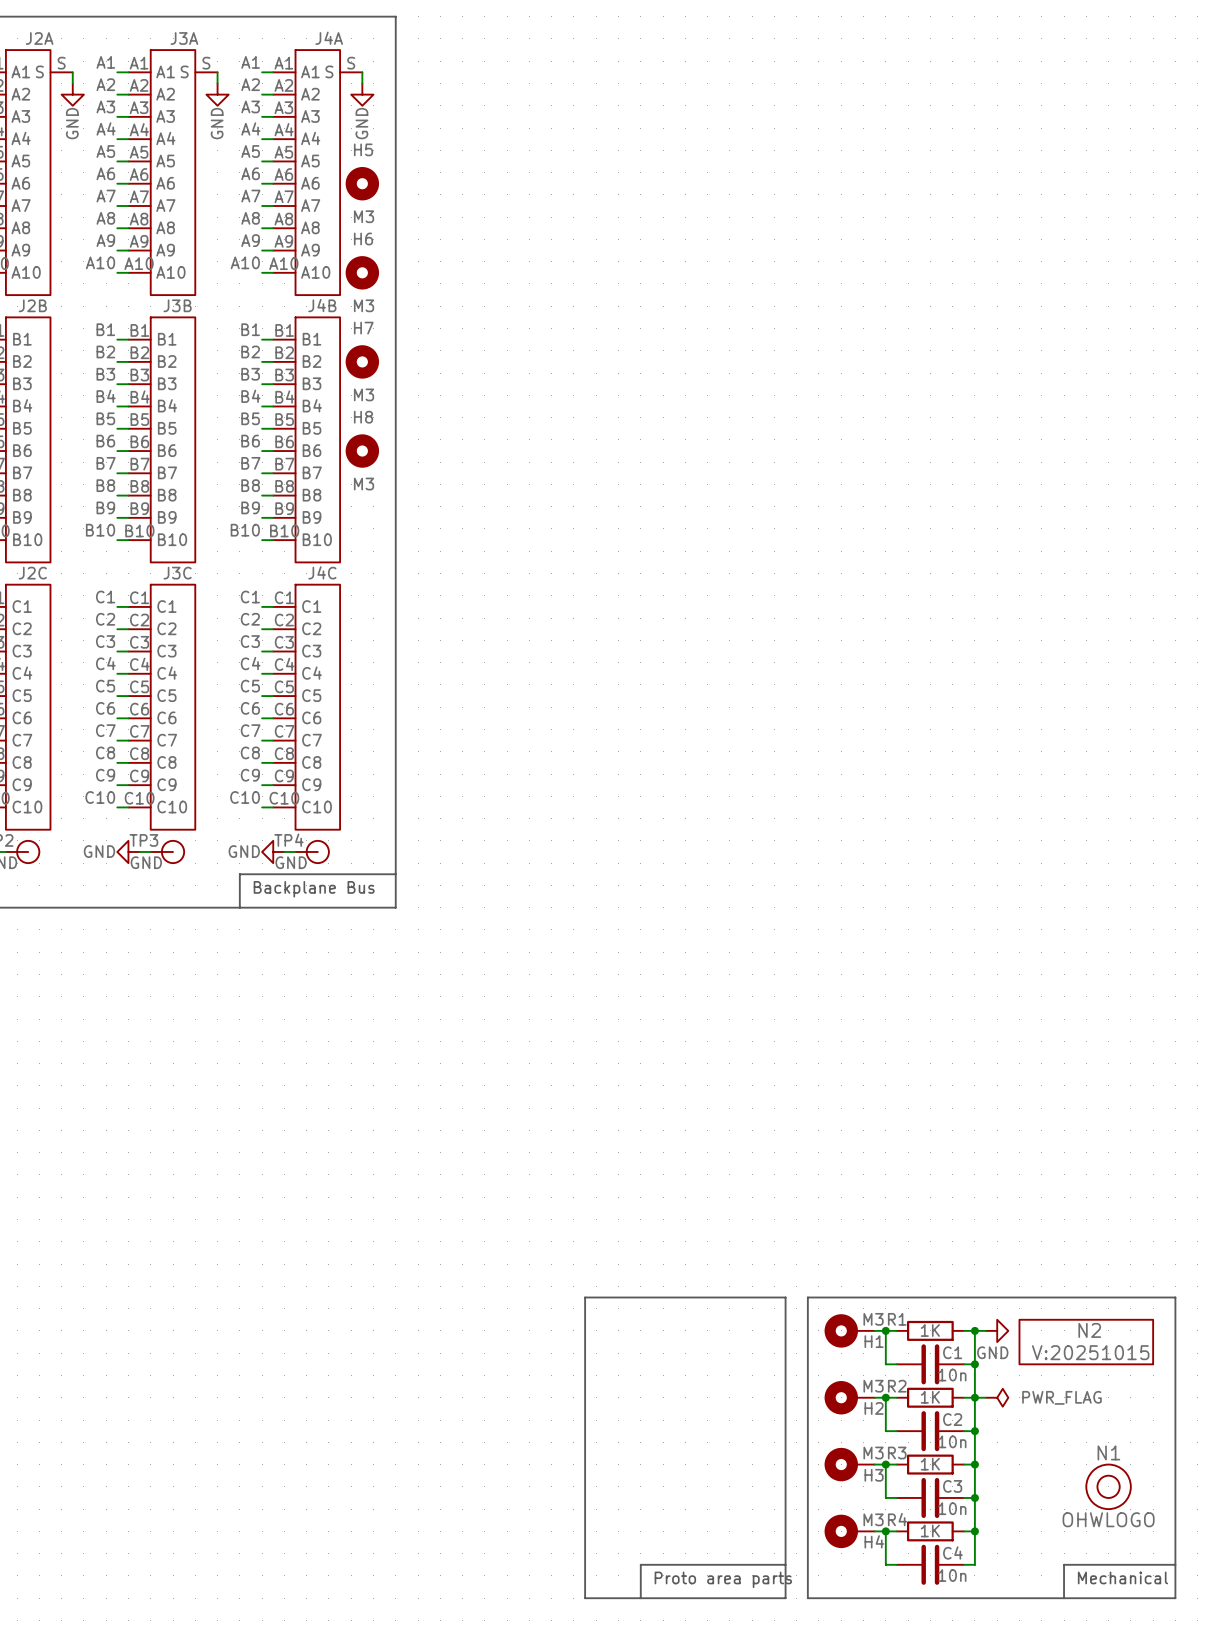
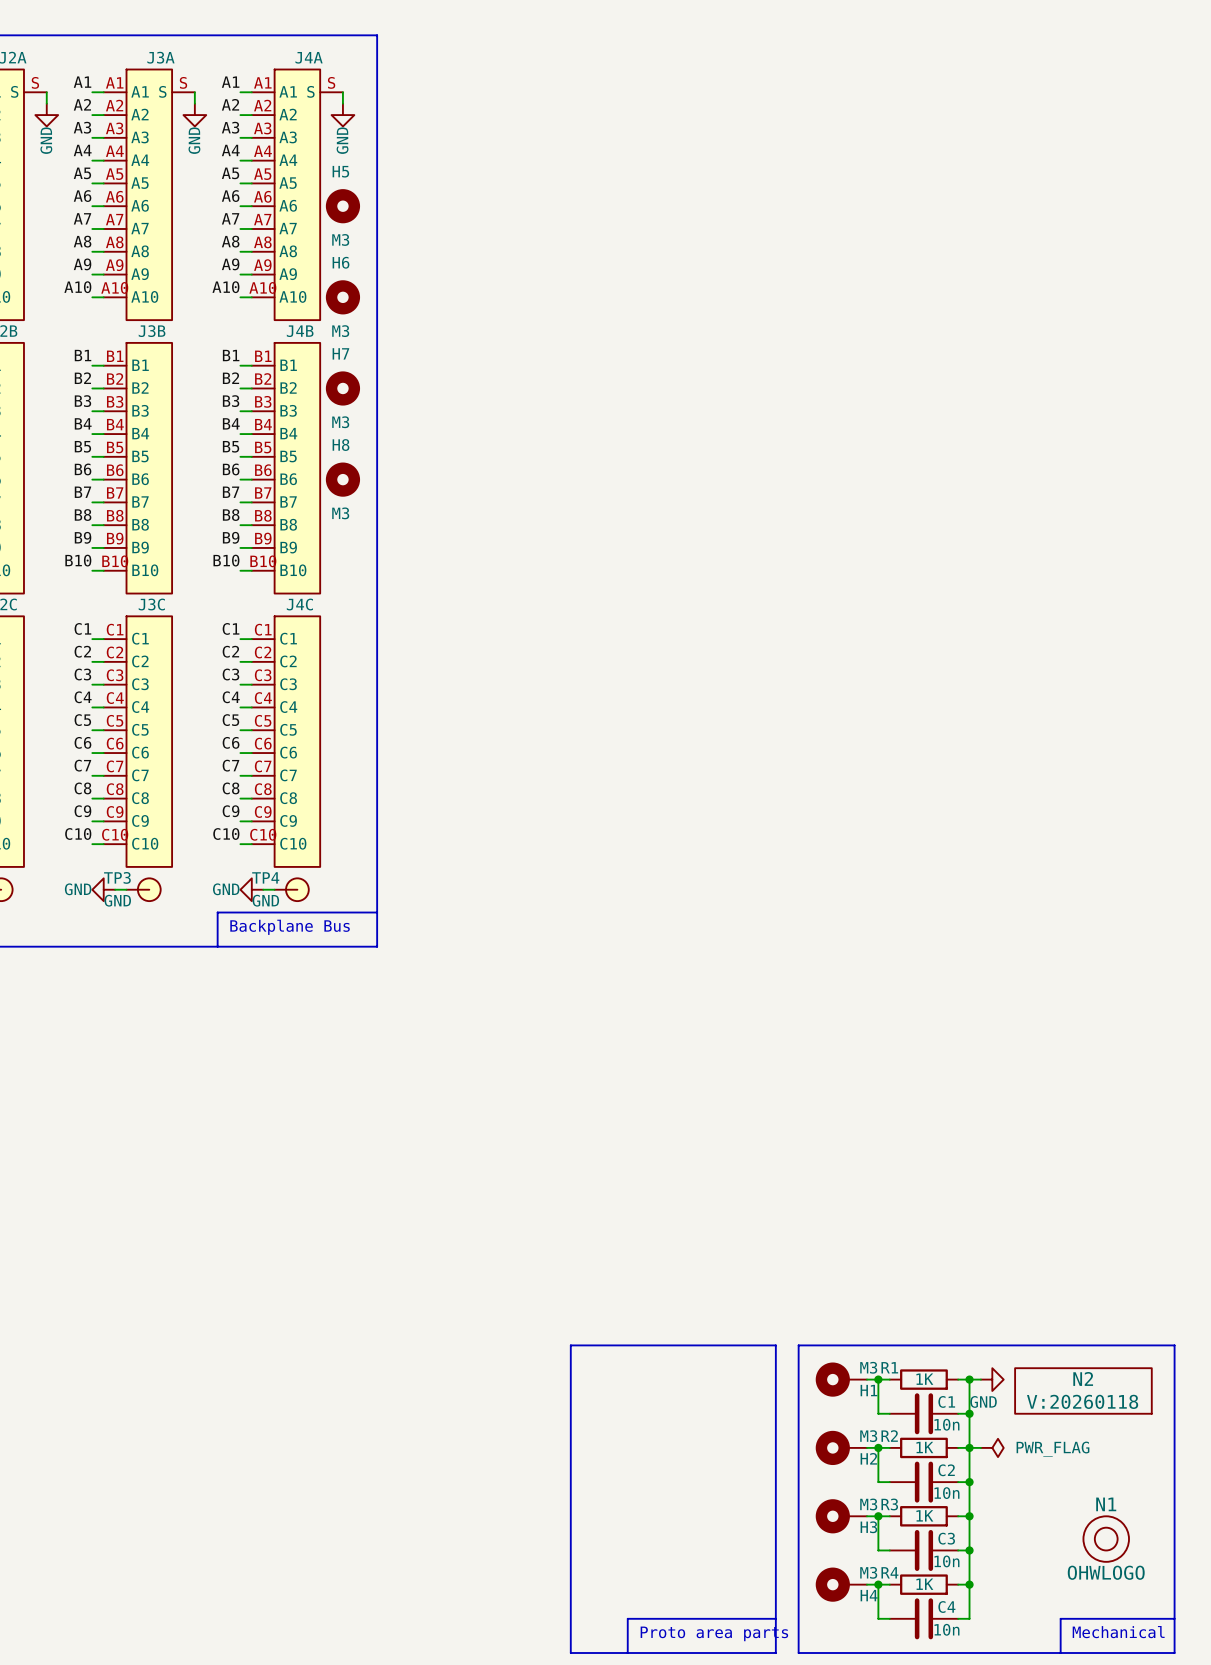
N2 value: V:20251015 (1090, 1352) -> V:20260118 (1082, 1401)

